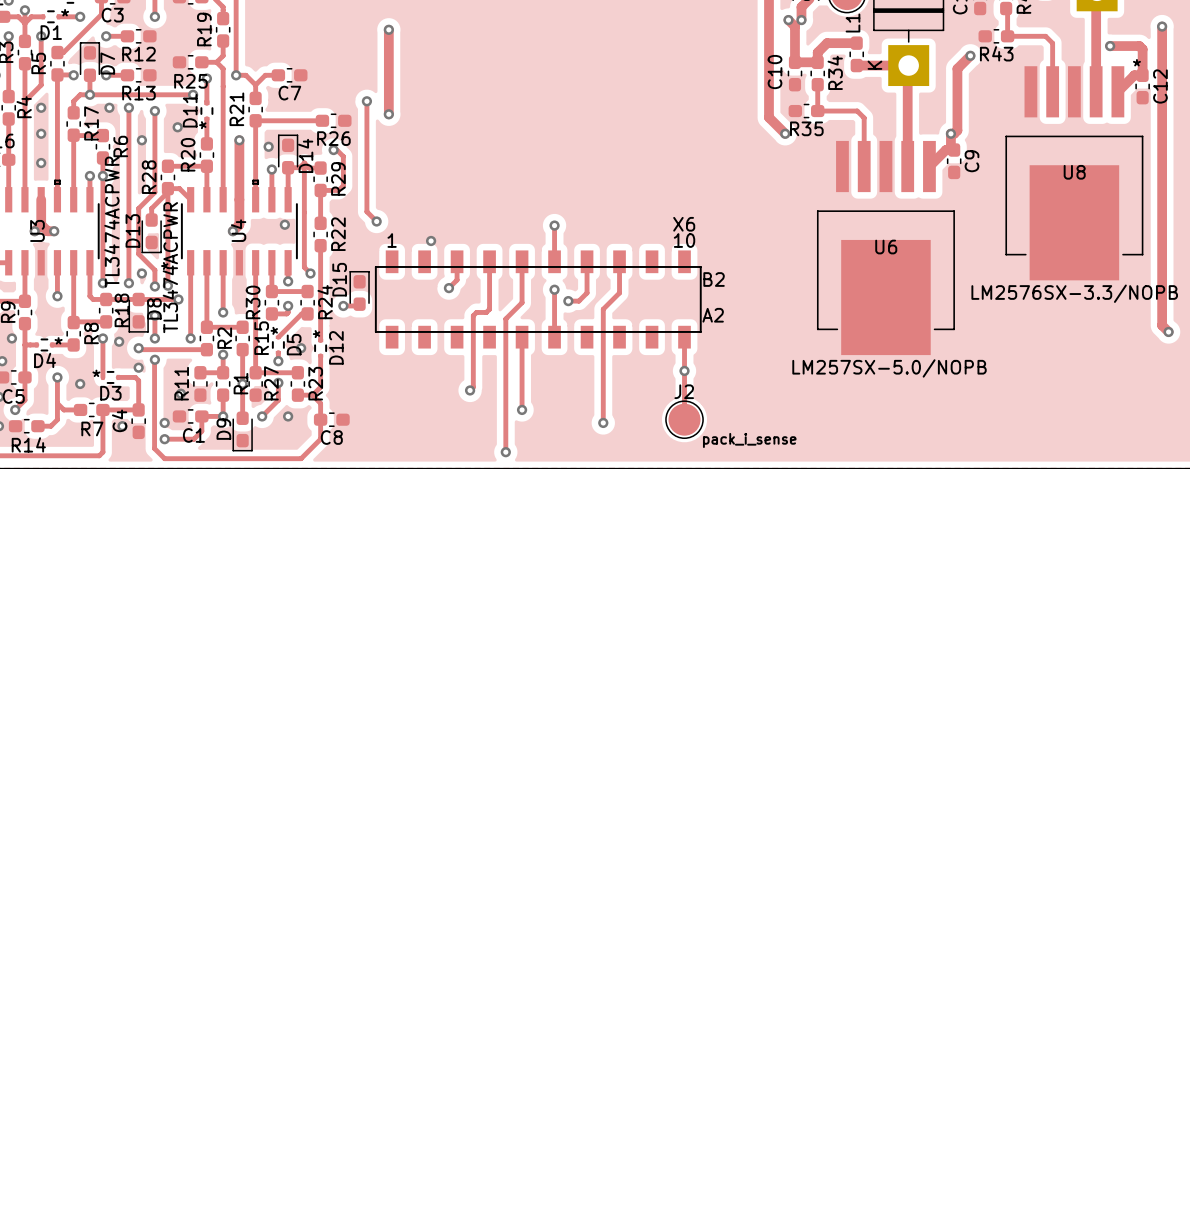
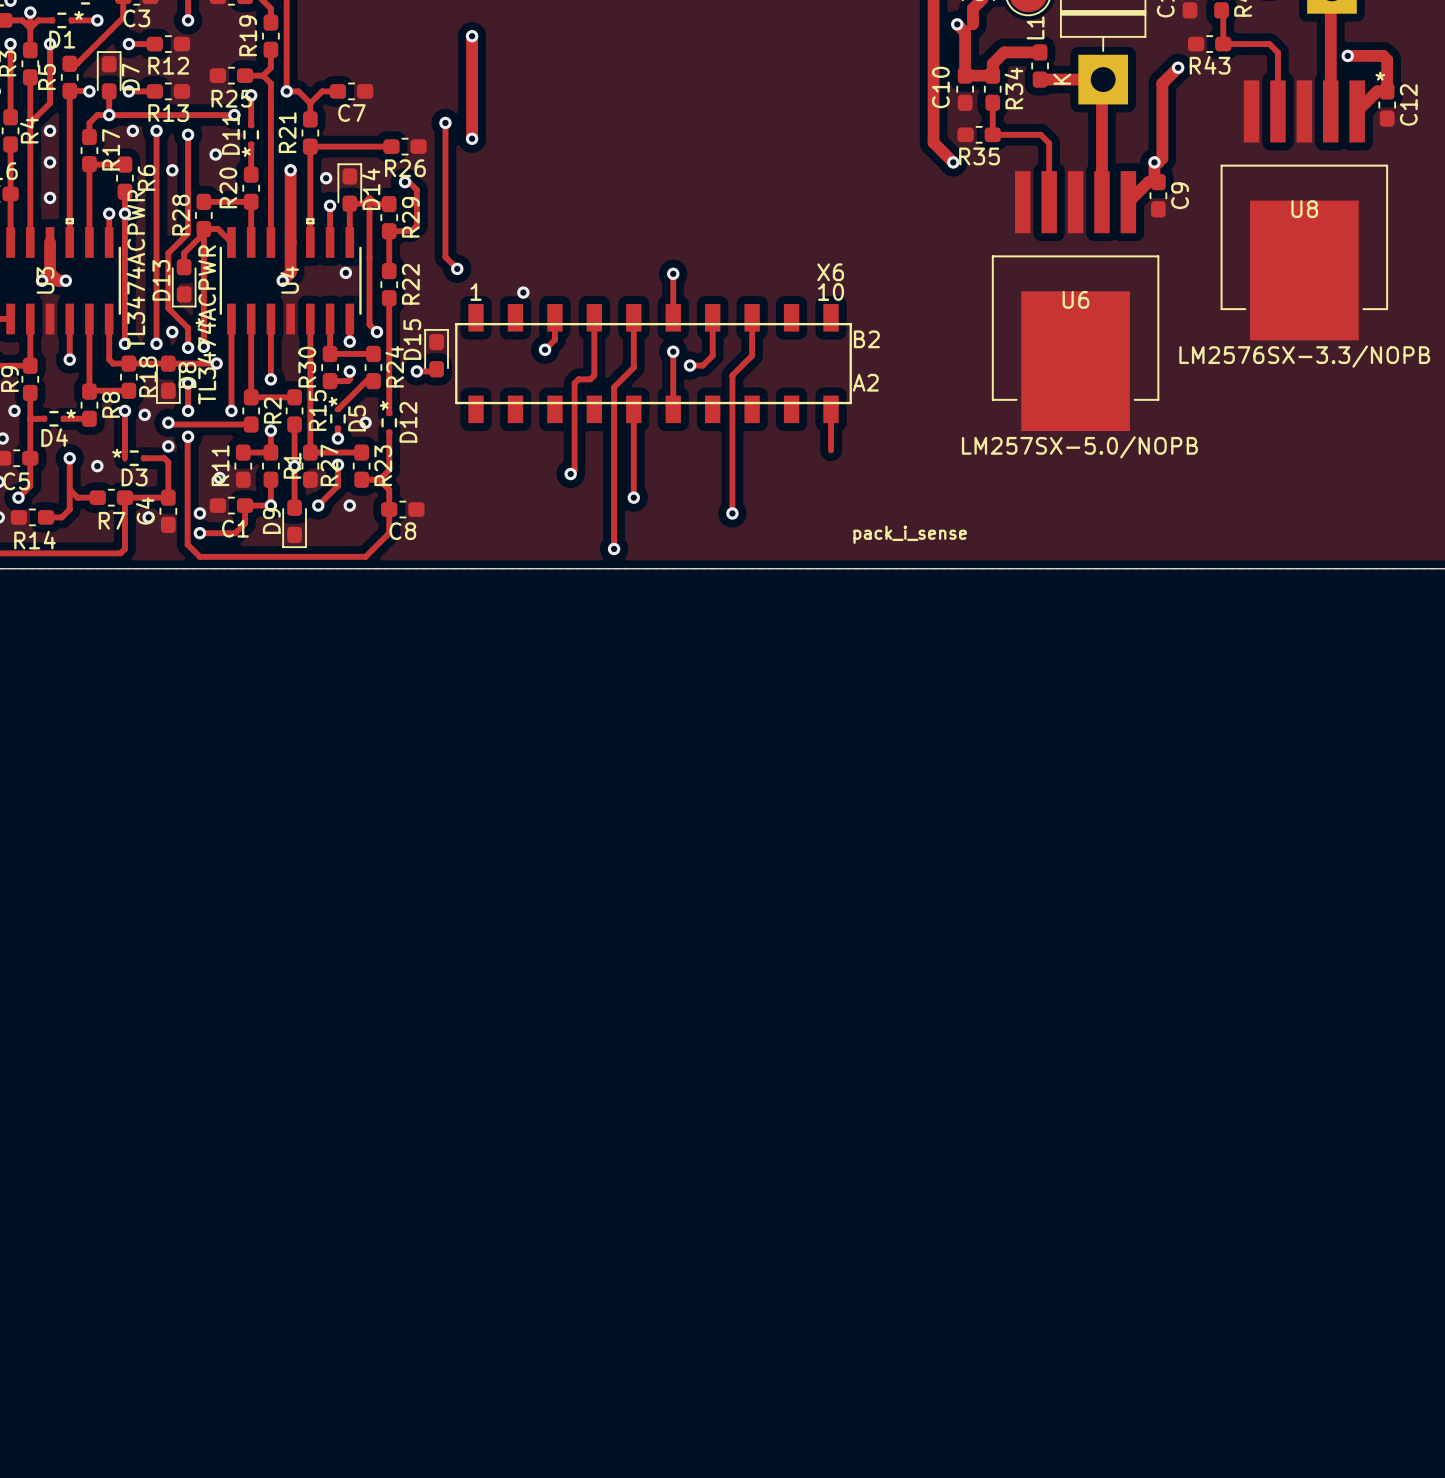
via: (801, 20) -> none
track: (1162, 26) (1162, 325) (1168, 331) -> none
via: (1162, 26) -> none
via: (1168, 331) -> none
track: (684, 370) (684, 419) -> none
via: (684, 370) -> none
J2: (684, 419) -> none

